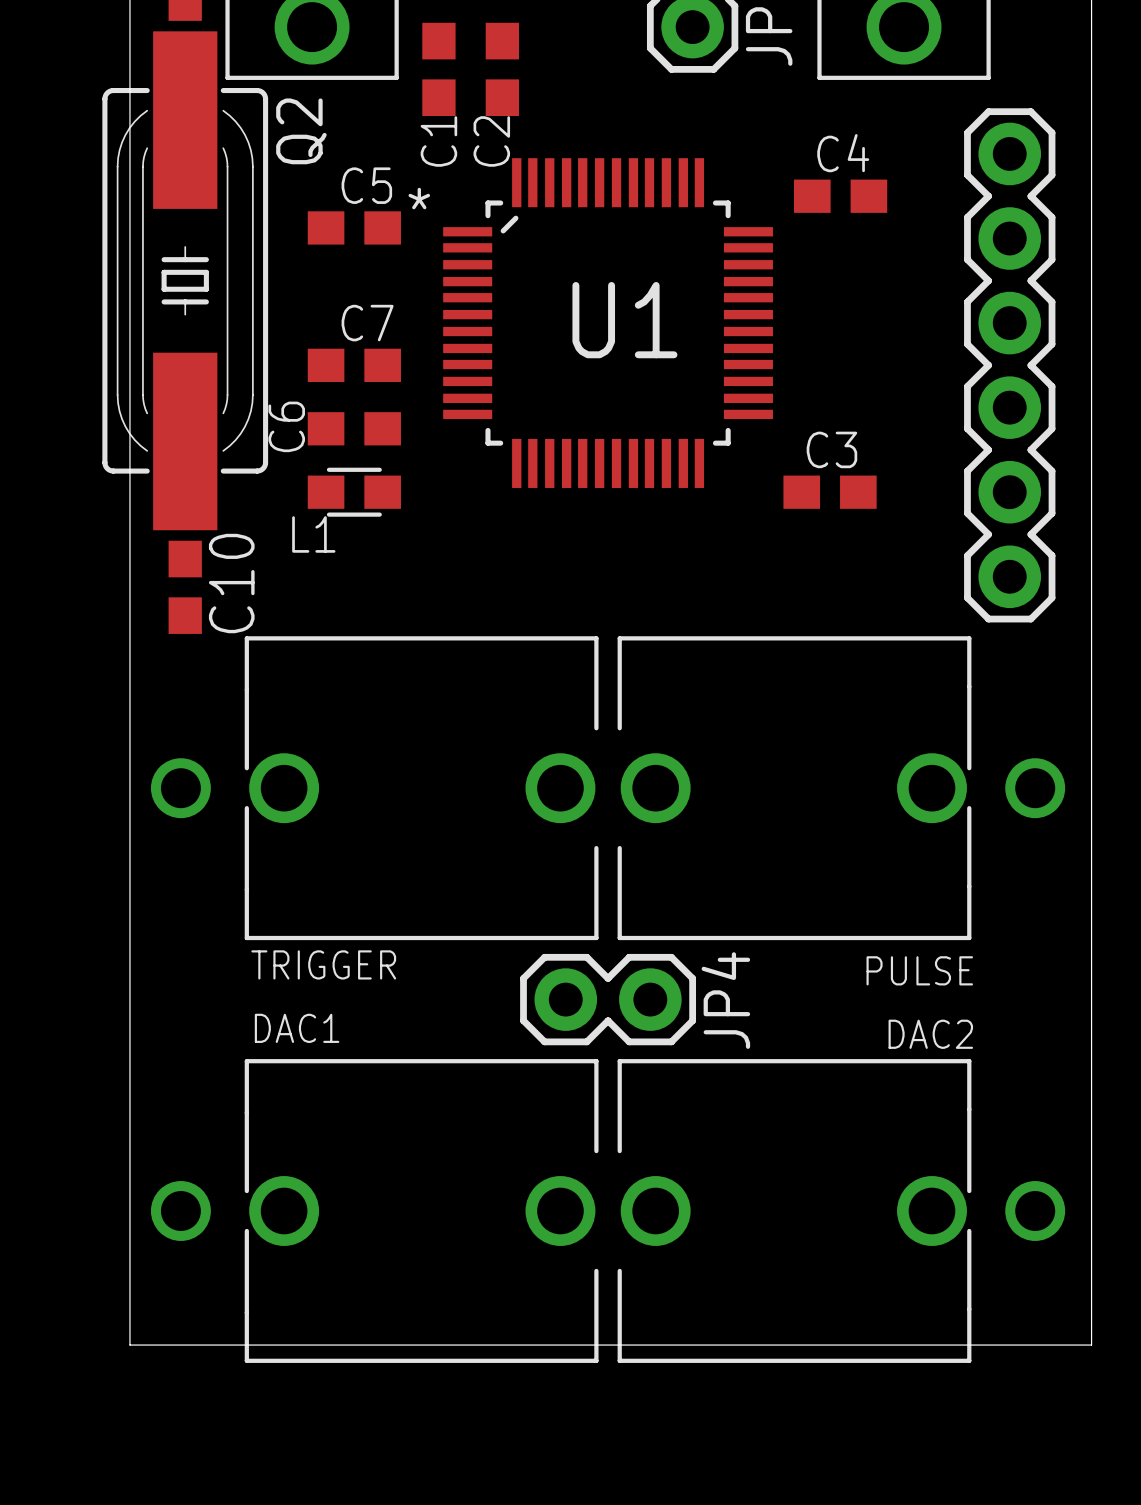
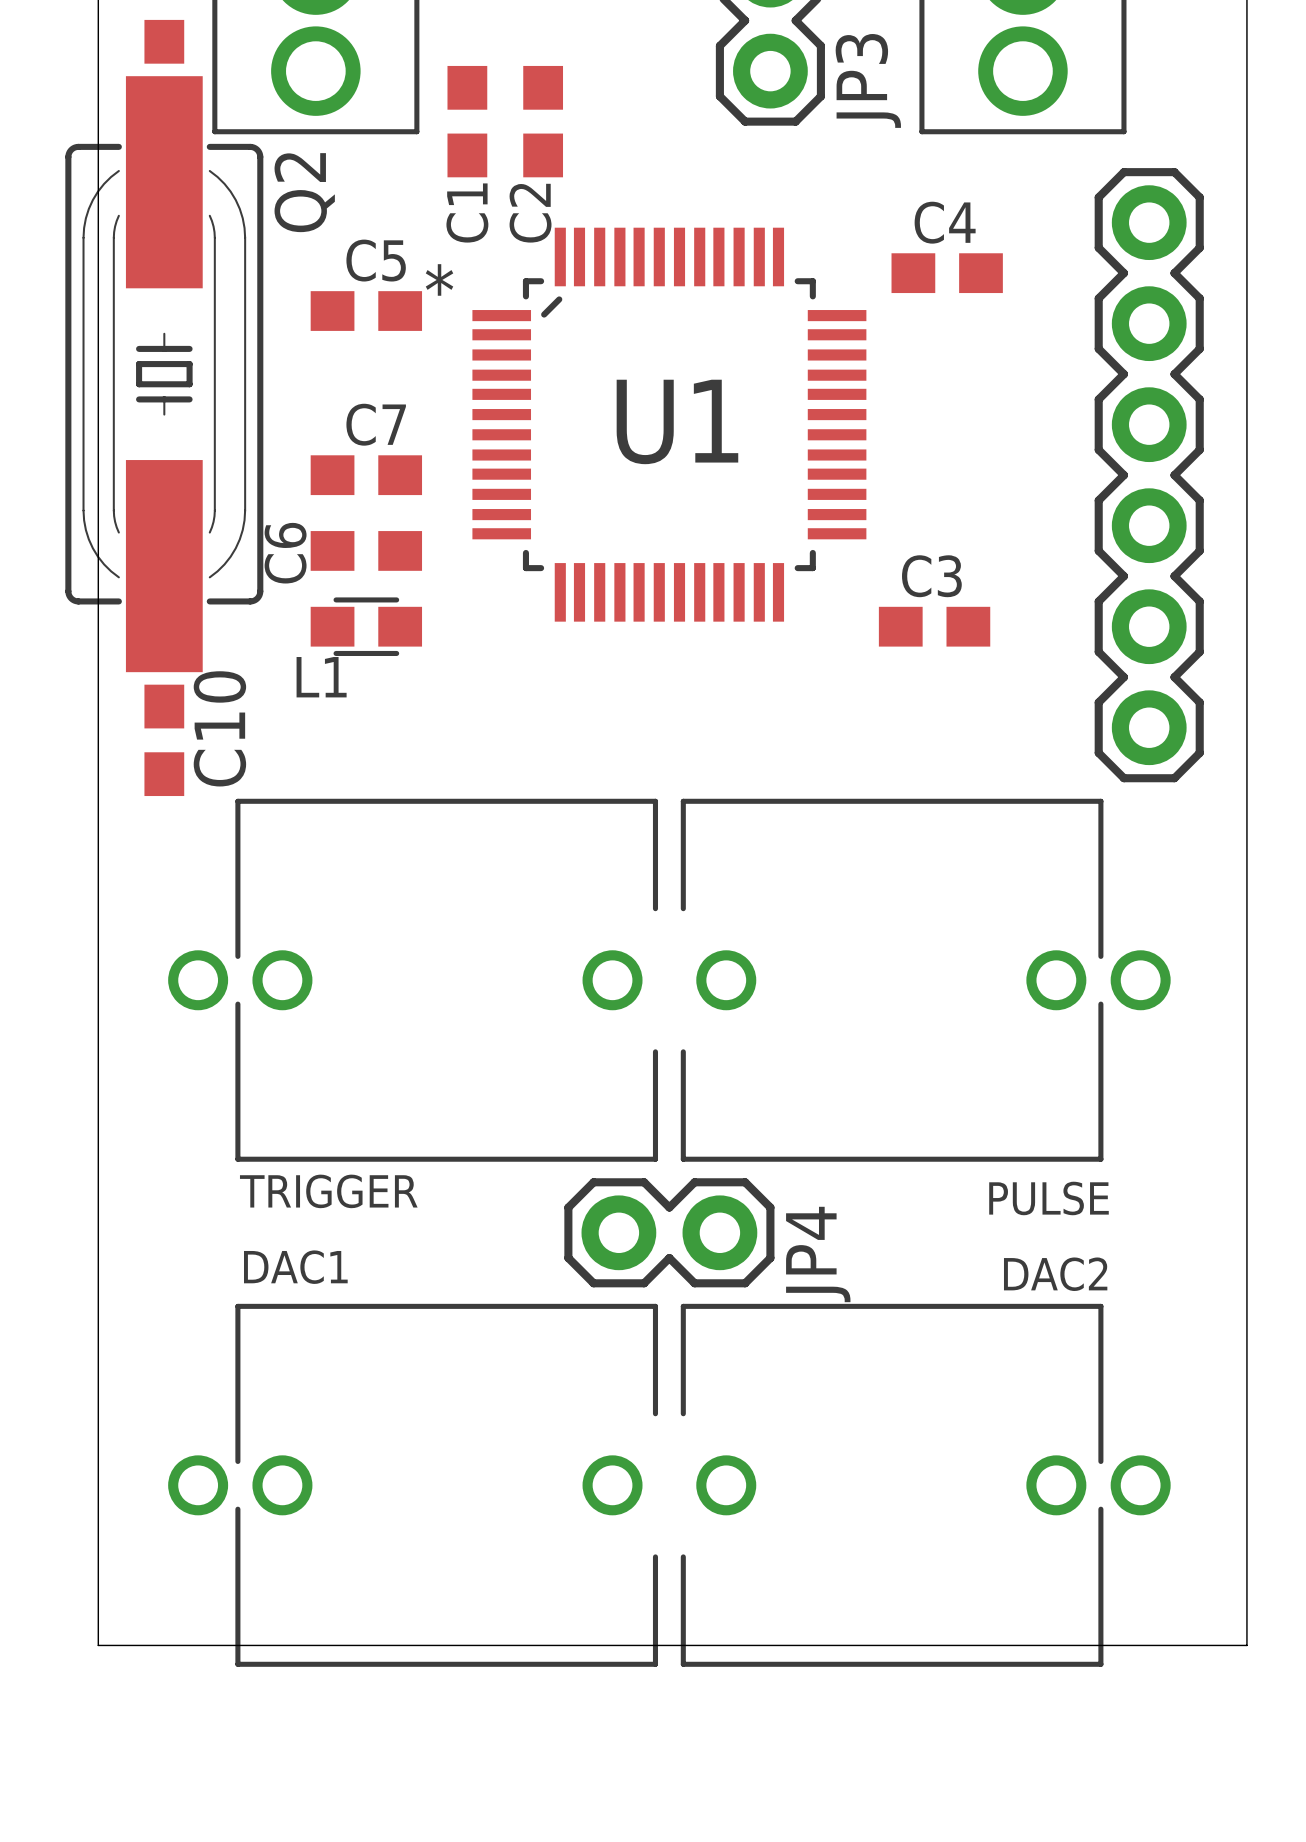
TRIGGER footprint: [150, 636, 599, 941] -> [168, 798, 659, 1162]
PULSE footprint: [617, 636, 1066, 941] -> [680, 798, 1171, 1162]
DAC1 footprint: [150, 1059, 599, 1363] -> [168, 1303, 659, 1667]
DAC2 footprint: [617, 1059, 1066, 1363] -> [680, 1303, 1171, 1667]

